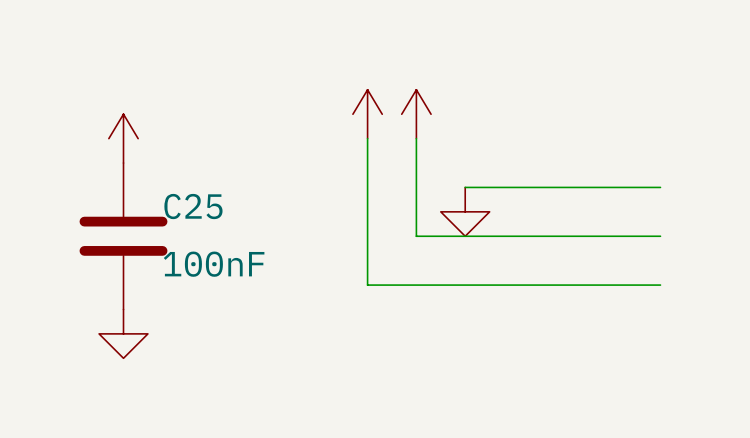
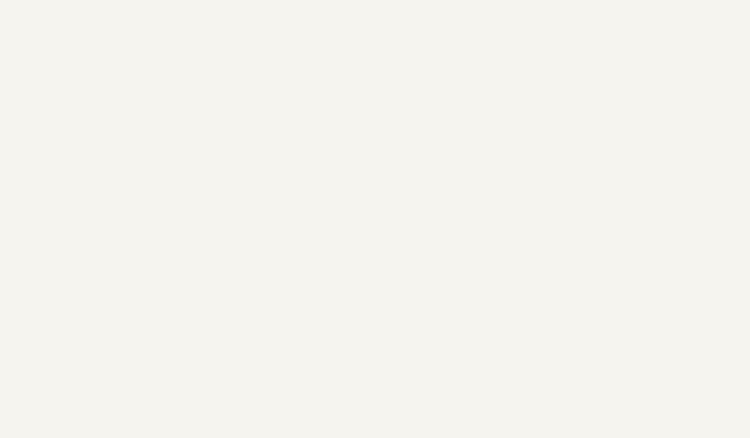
power symbol: (367, 114) -> none
power symbol: (416, 114) -> none
power symbol: (123, 138) -> none
wire: (367, 138) (367, 285) (660, 285) -> none
wire: (416, 138) (416, 236) (660, 236) -> none
wire: (465, 187) (660, 187) -> none
power symbol: (465, 211) -> none
C25: 100nF (123, 236) -> none
power symbol: (123, 333) -> none

